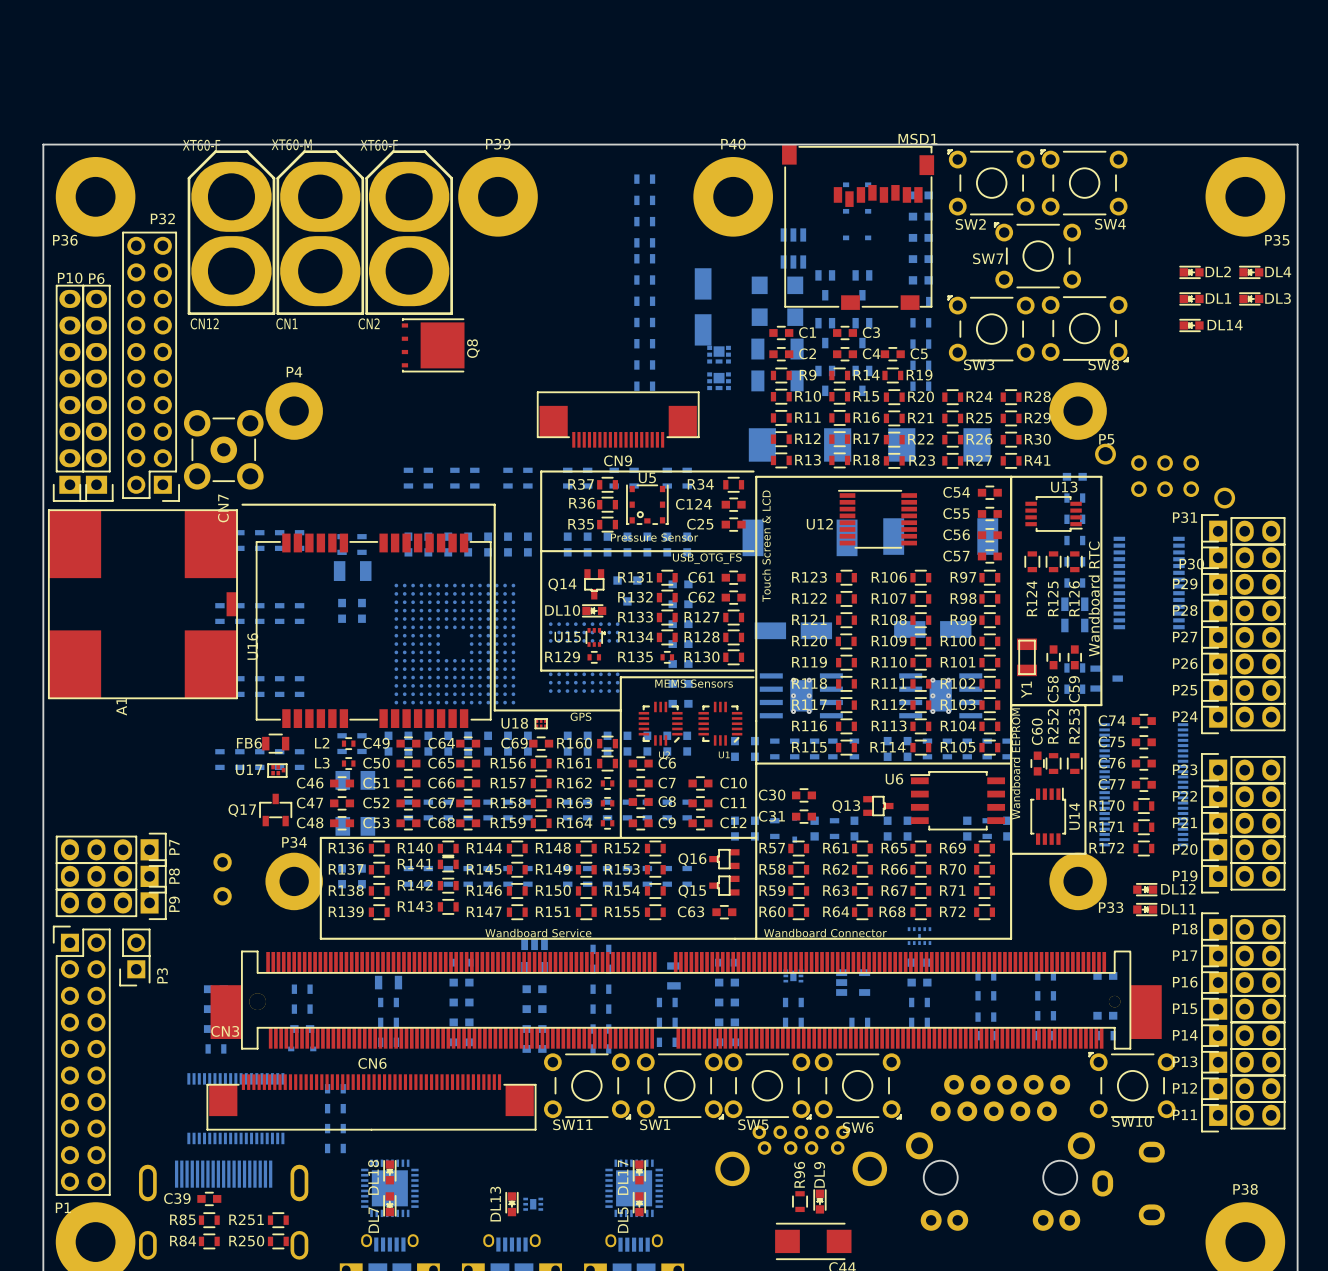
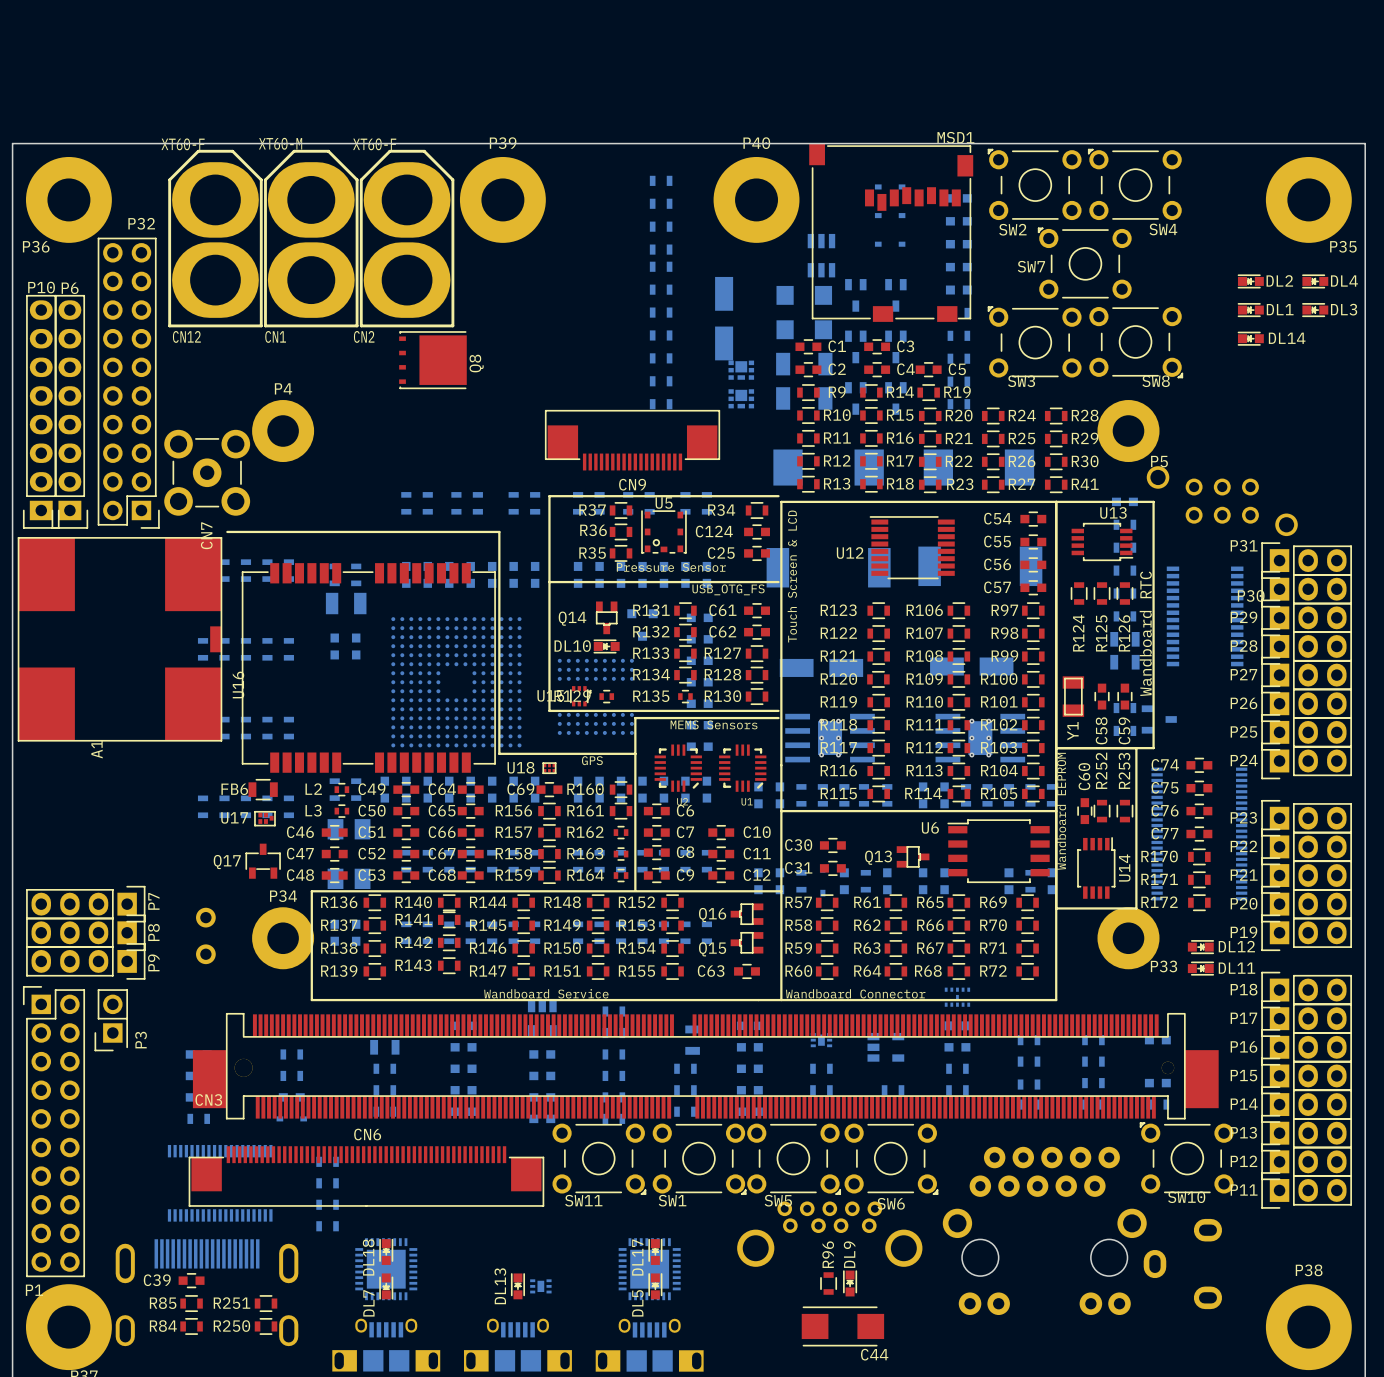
U15 position: (595, 637) -> (580, 696)

